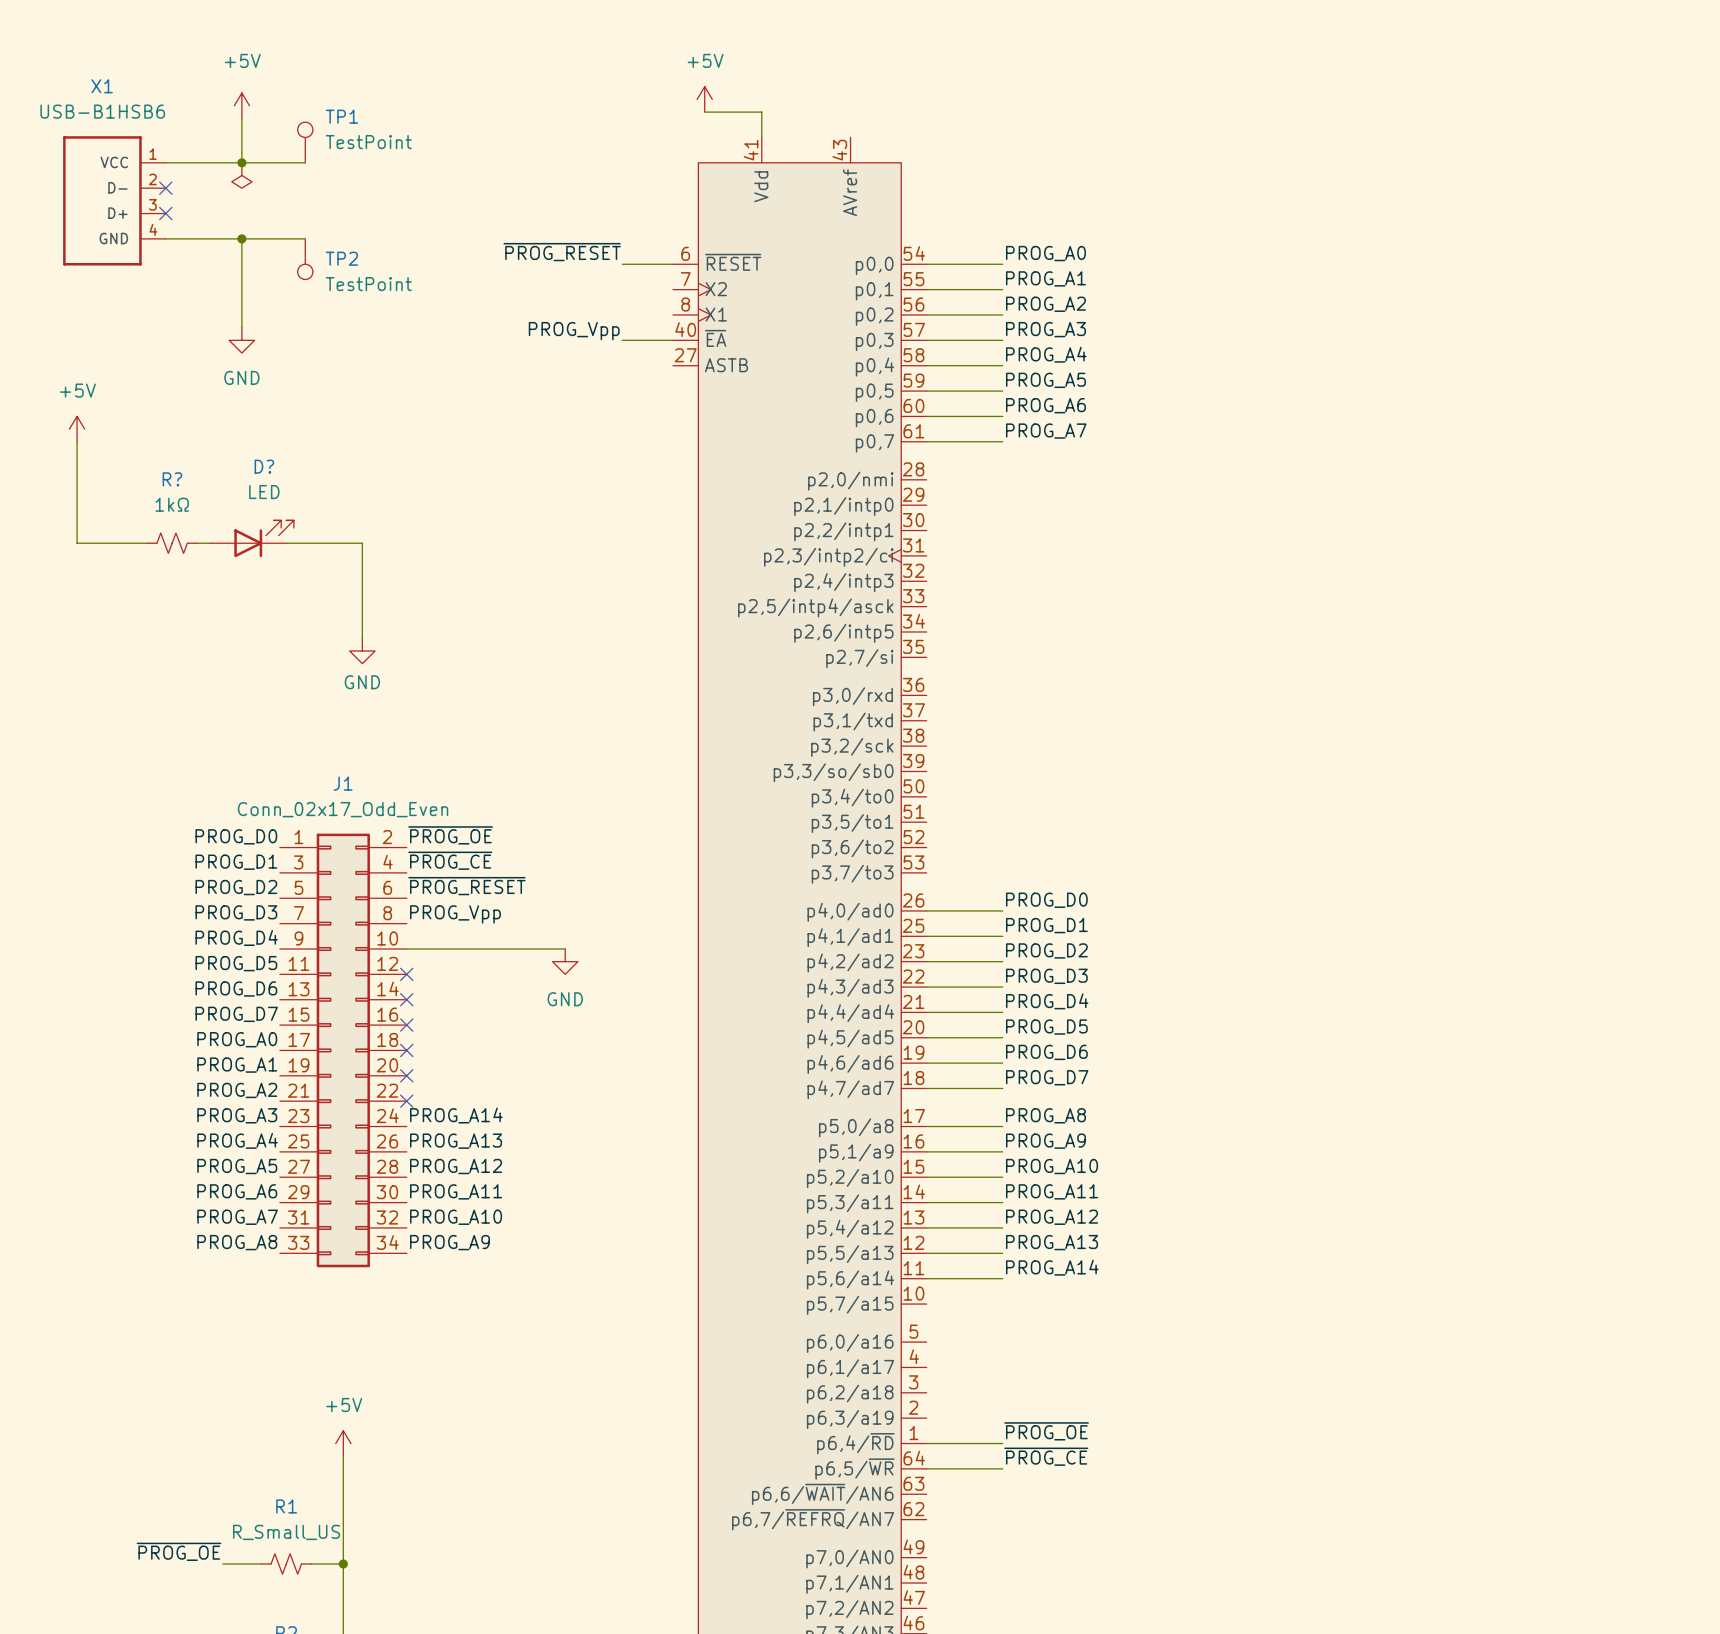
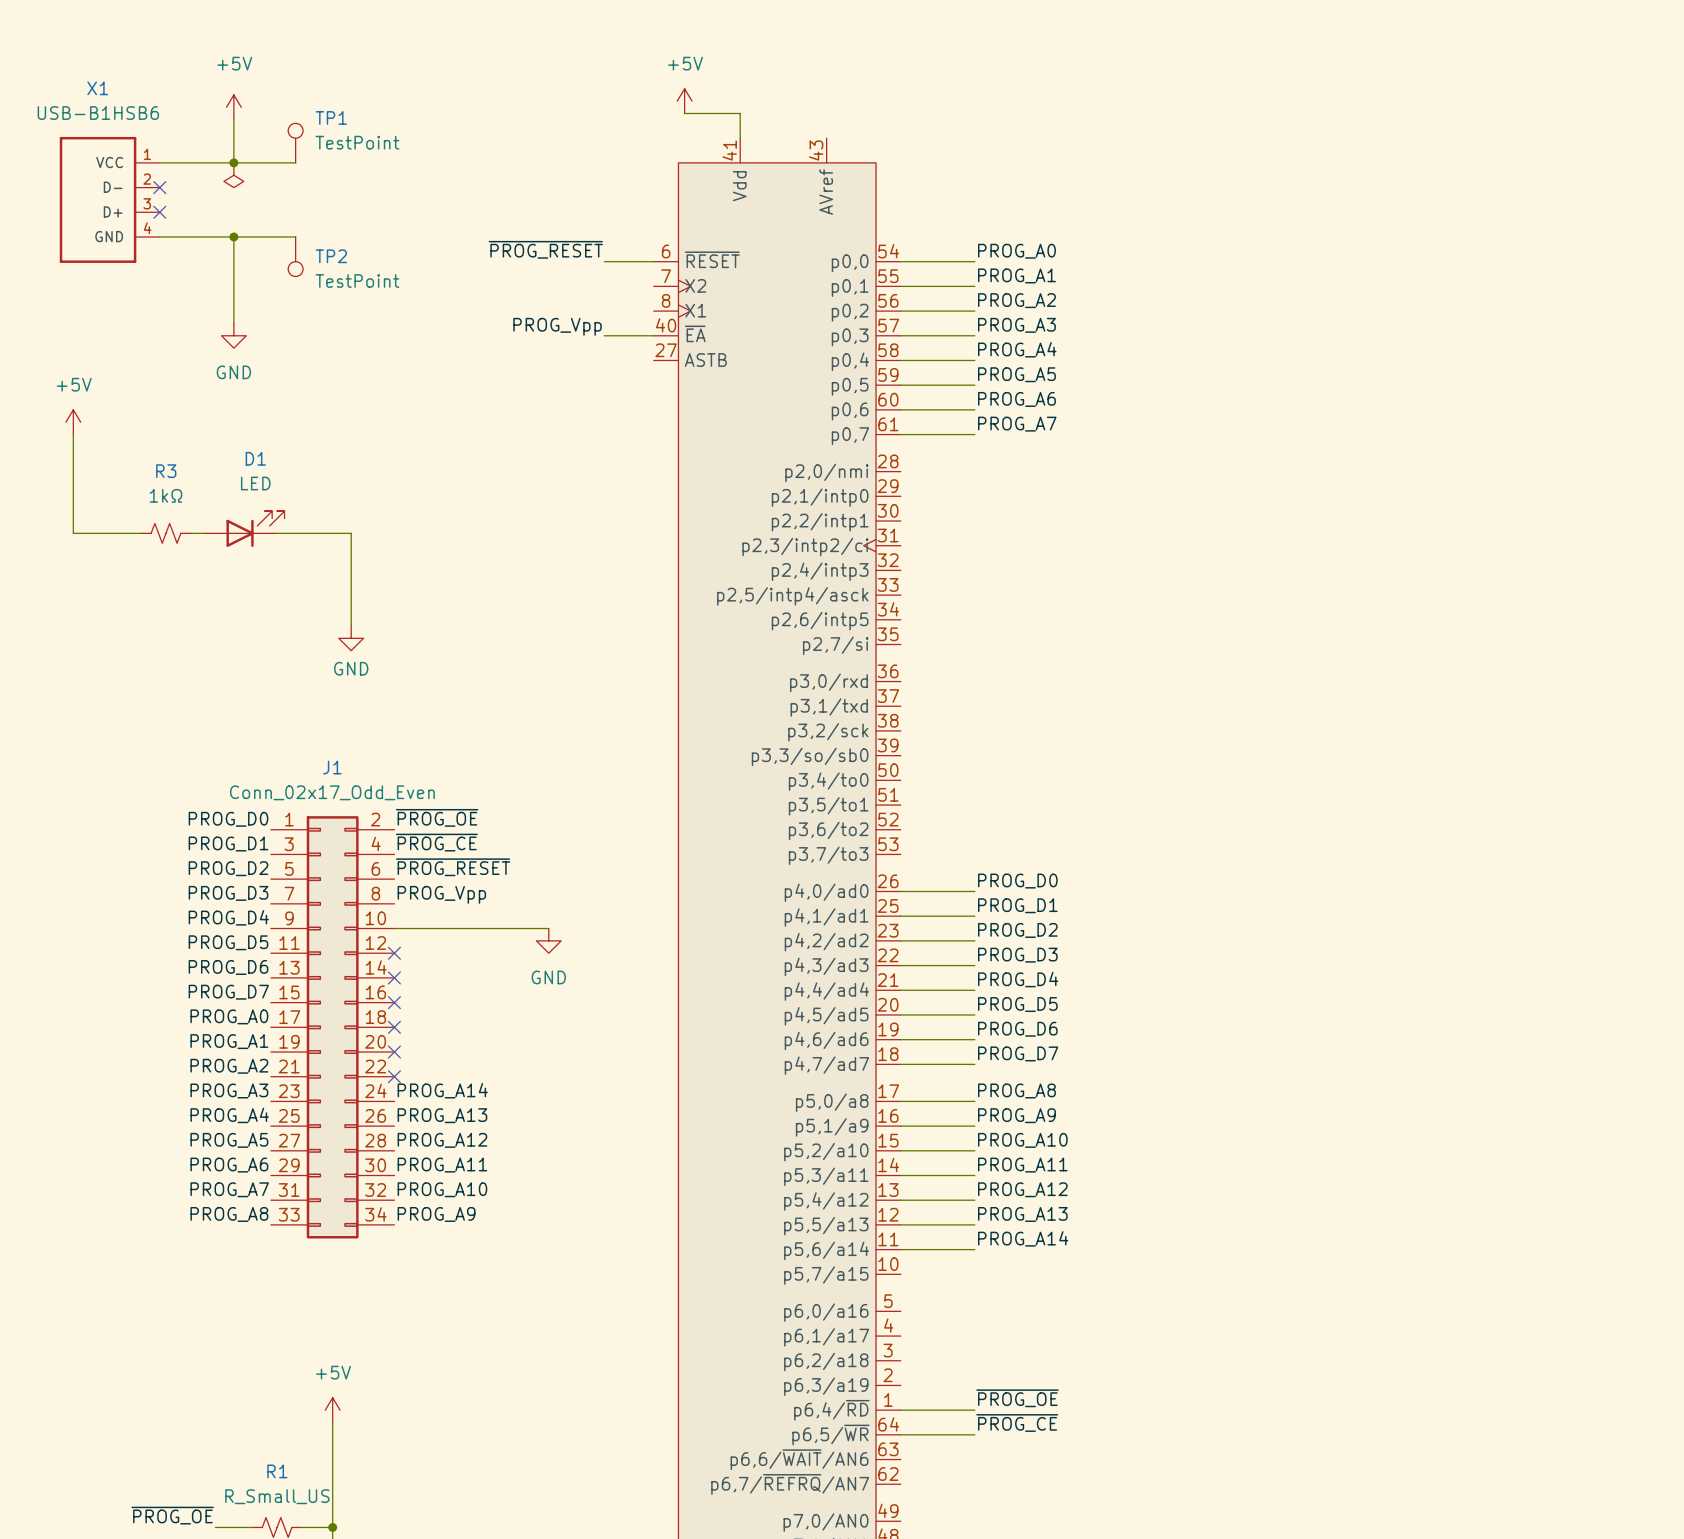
D? name: D? (264, 466) -> D1 (255, 458)
R? name: R? (172, 479) -> R3 (166, 471)

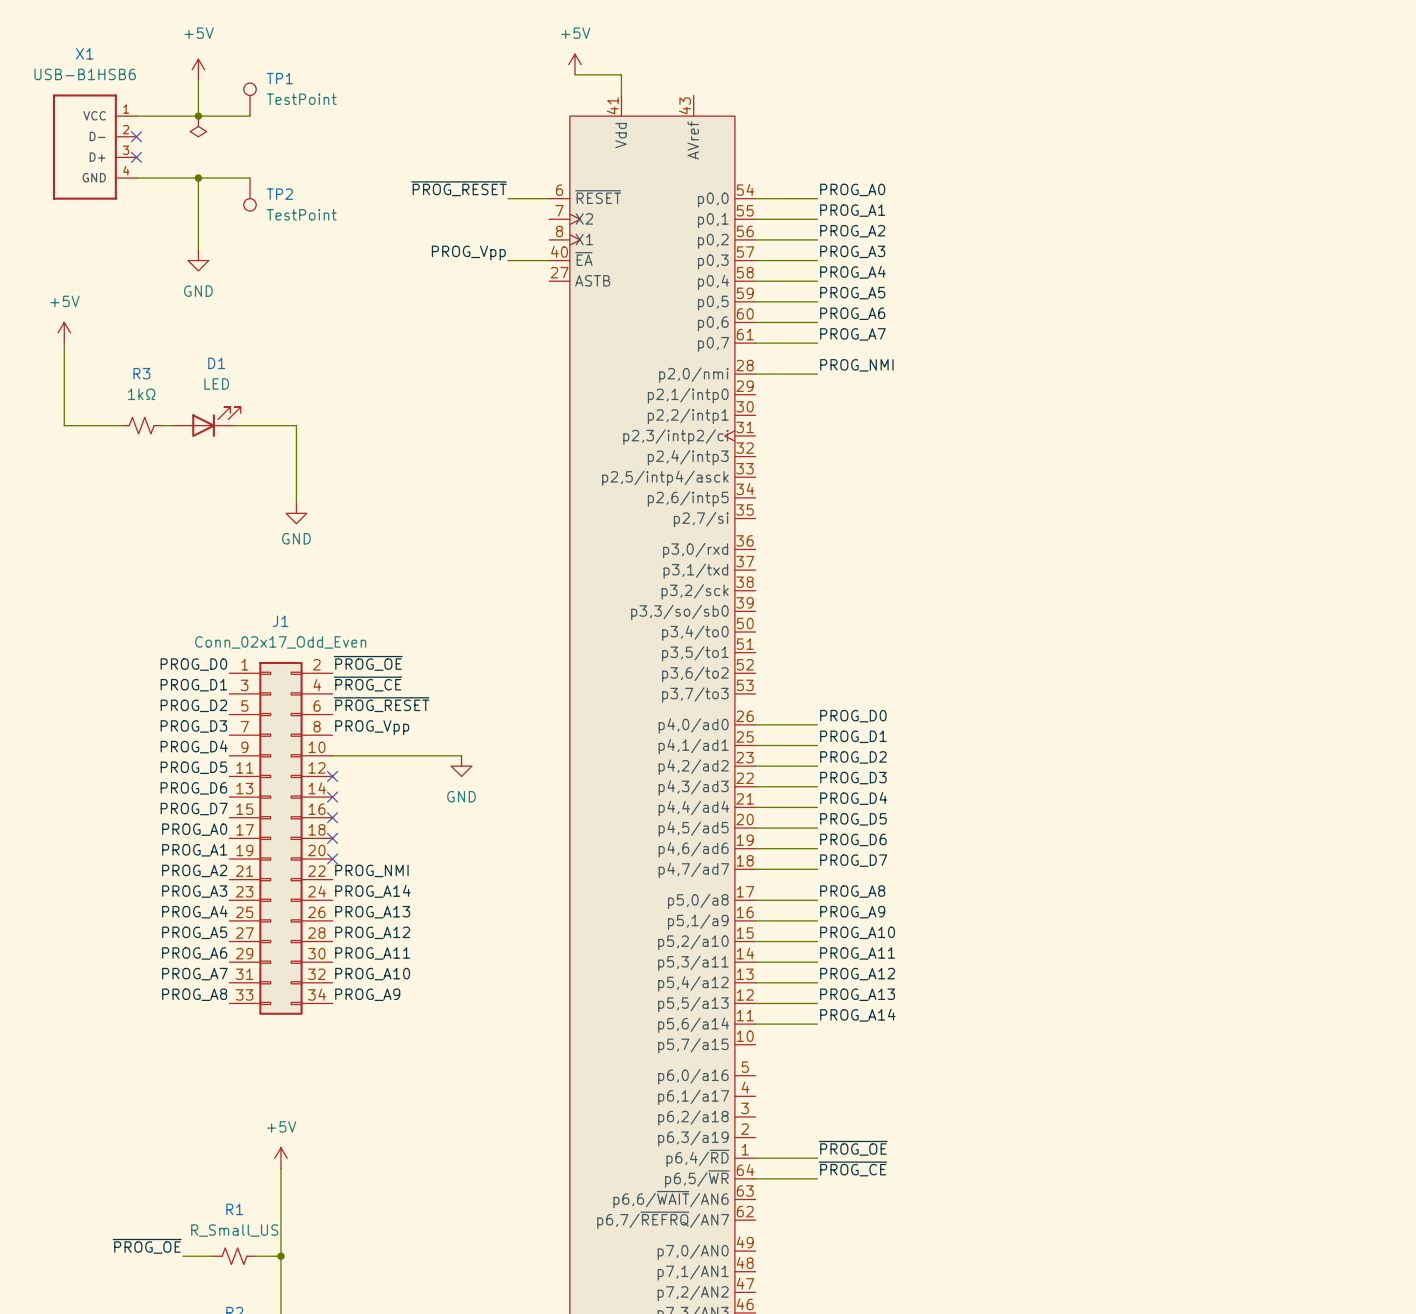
label: none -> PROG_NMI (856, 365)
wire: none -> (755, 374) (817, 374)
label: none -> PROG_NMI (371, 870)
no-connect mark: (394, 1076) -> none

